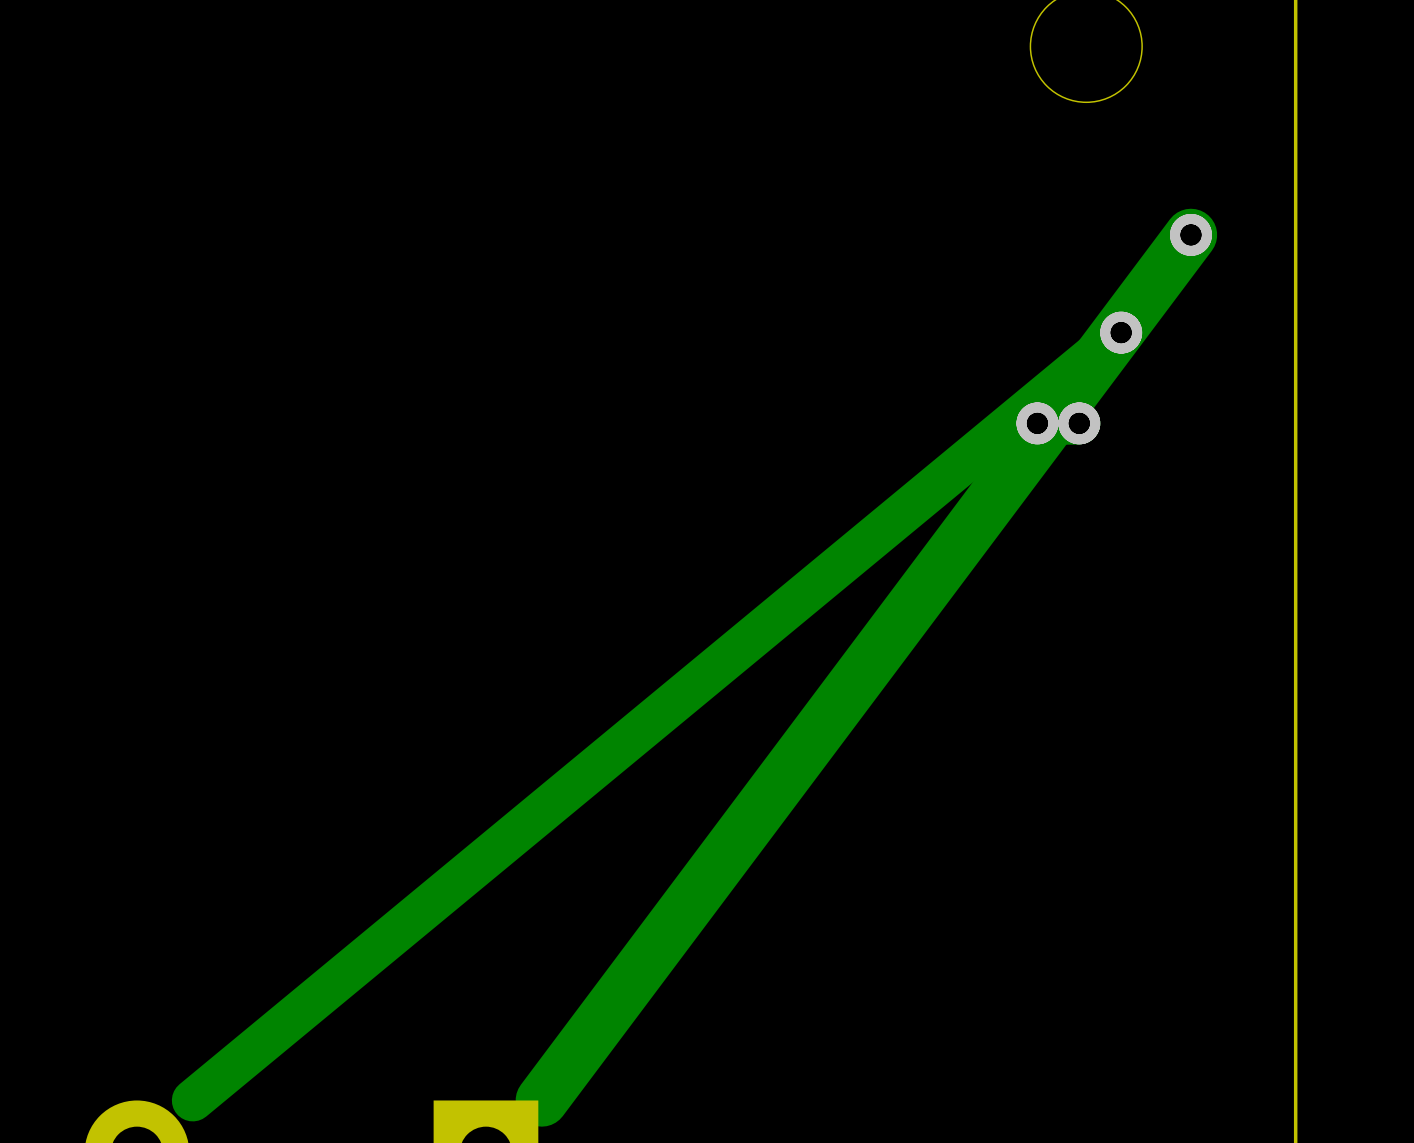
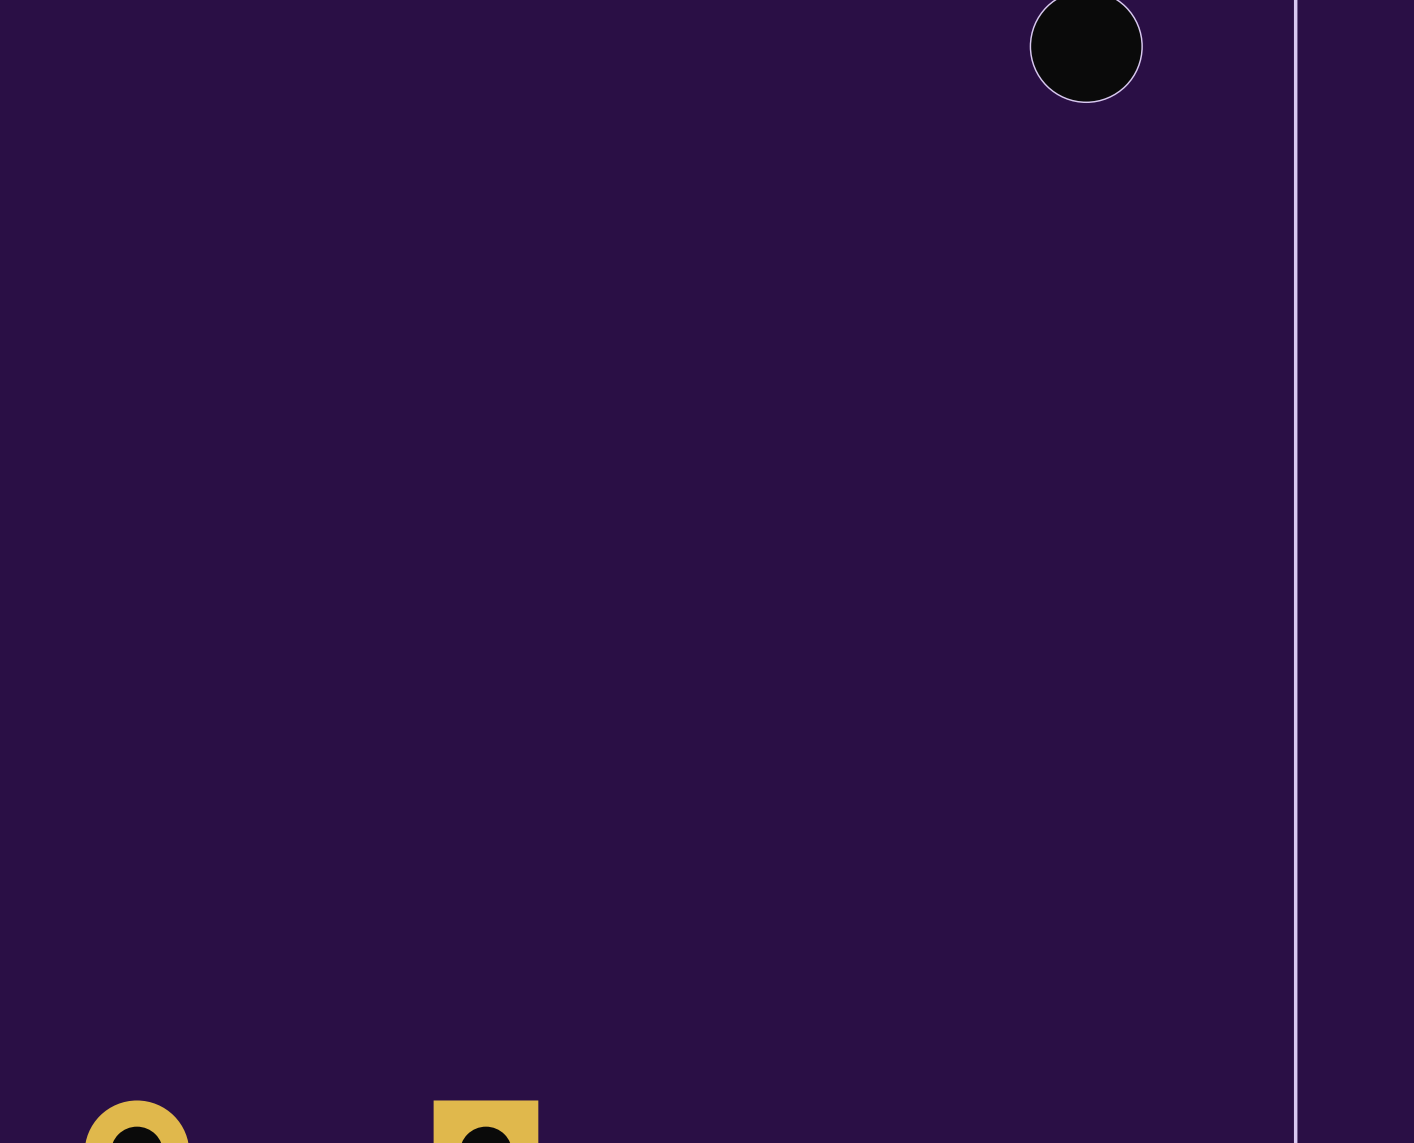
track: (1190, 234) (541, 1100) -> none
via: (1190, 234) -> none
track: (1121, 332) (192, 1100) -> none
via: (1121, 332) -> none
via: (1037, 423) -> none
via: (1079, 423) -> none

